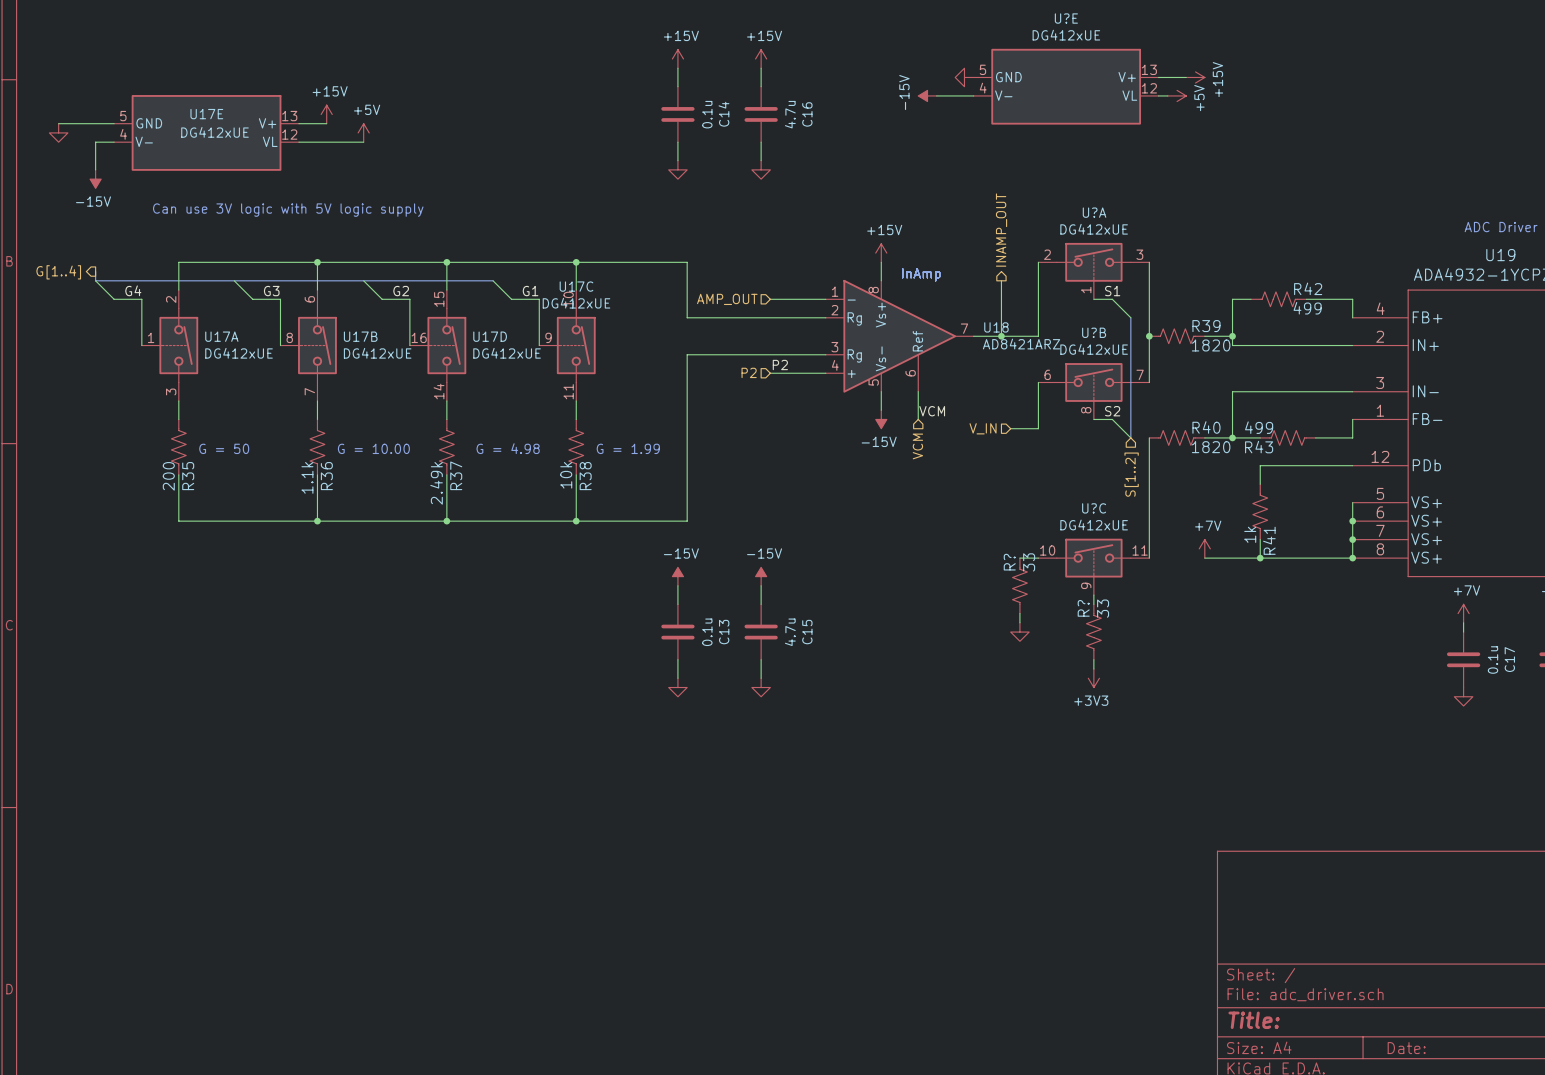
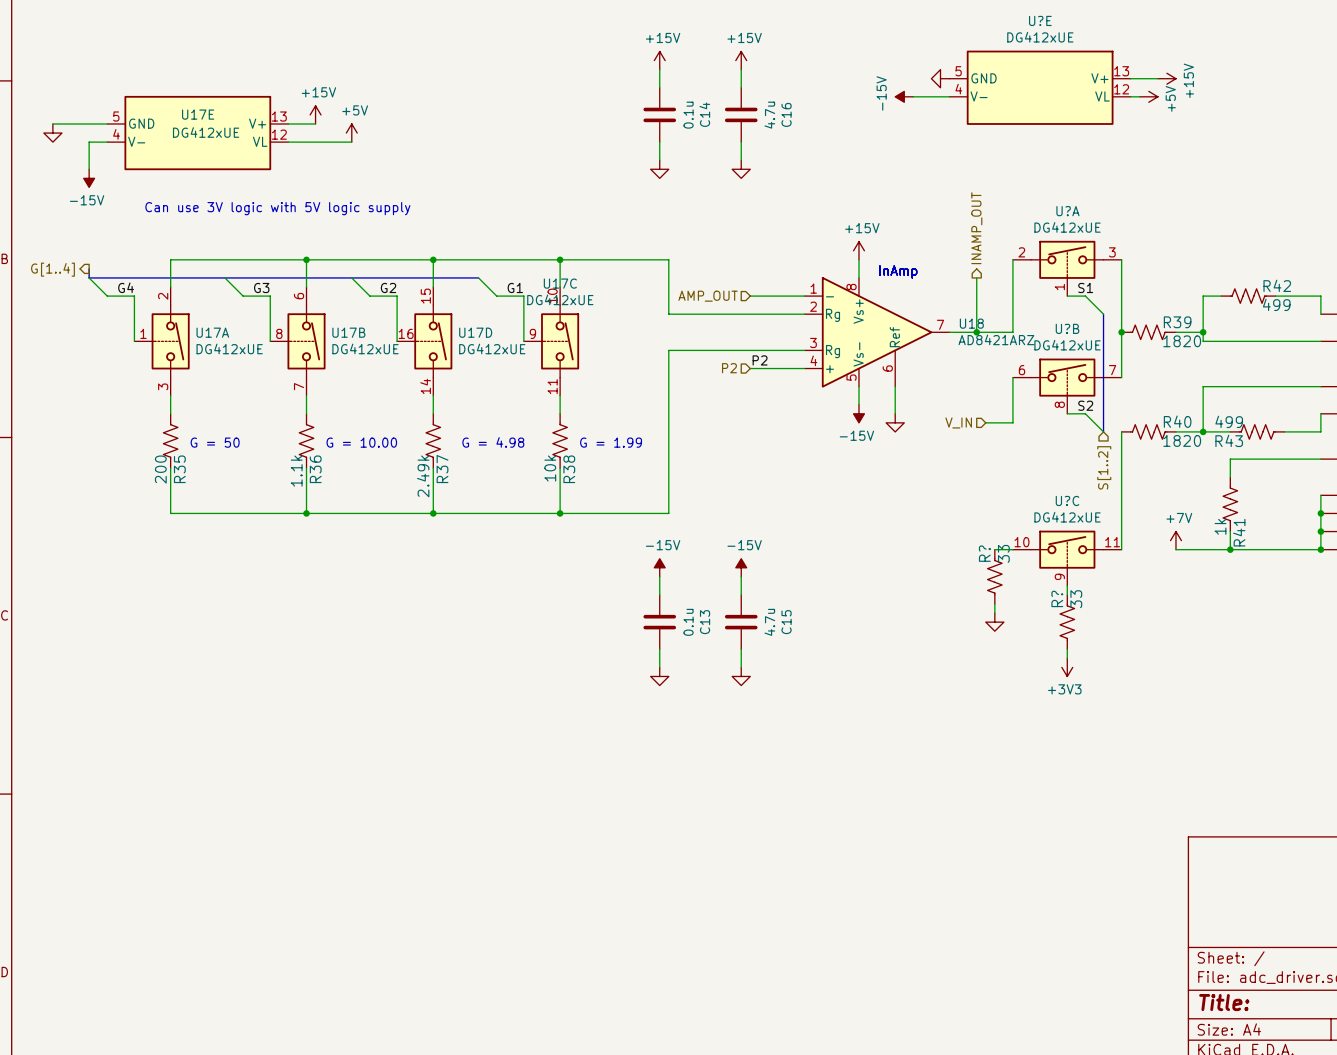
label: VCM (932, 411) -> none
power symbol: none -> (895, 422)
hierarchical label: VCM (917, 446) -> none

